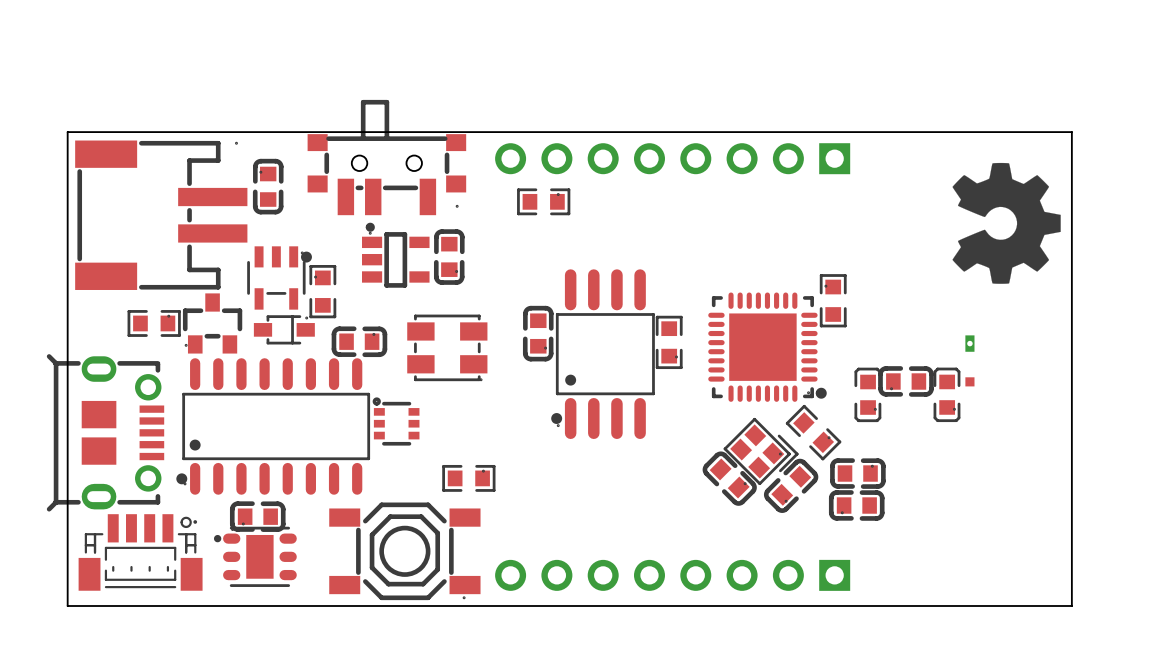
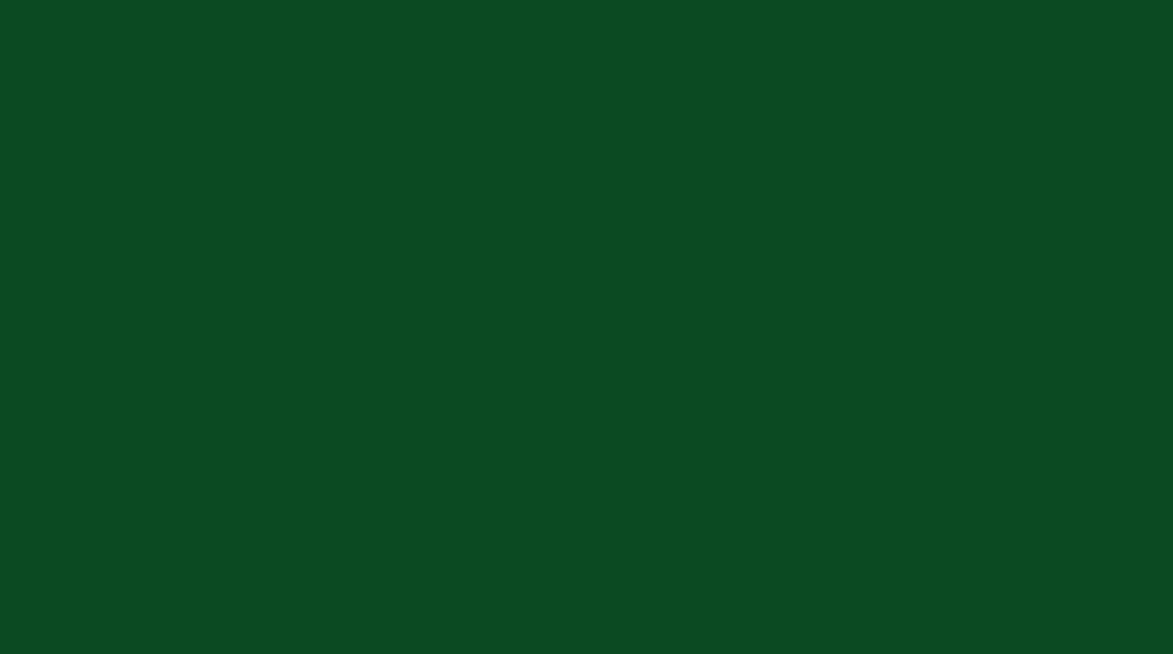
board edge: (67, 132) (1071, 132) (1071, 605) (67, 605) (67, 132) -> none
part: (386, 157) -> none
part: (672, 158) -> none
drawing: [952, 162, 1061, 284] -> none
part: (268, 186) -> none
part: (543, 201) -> none
part: (161, 215) -> none
part: (395, 255) -> none
part: (449, 257) -> none
part: (279, 277) -> none
part: (322, 291) -> none
part: (833, 300) -> none
part: (154, 323) -> none
part: (212, 323) -> none
part: (284, 329) -> none
part: (538, 333) -> none
part: (359, 341) -> none
part: (669, 342) -> none
part: (447, 347) -> none
part: (767, 347) -> none
part: (603, 354) -> none
part: (969, 360) -> none
part: (905, 381) -> none
part: (867, 394) -> none
part: (946, 394) -> none
part: (396, 421) -> none
part: (273, 426) -> none
part: (105, 432) -> none
part: (813, 432) -> none
part: (761, 451) -> none
part: (857, 473) -> none
part: (468, 478) -> none
part: (729, 478) -> none
part: (791, 485) -> none
part: (856, 505) -> none
part: (257, 516) -> none
part: (404, 551) -> none
part: (140, 552) -> none
part: (255, 556) -> none
part: (672, 575) -> none

